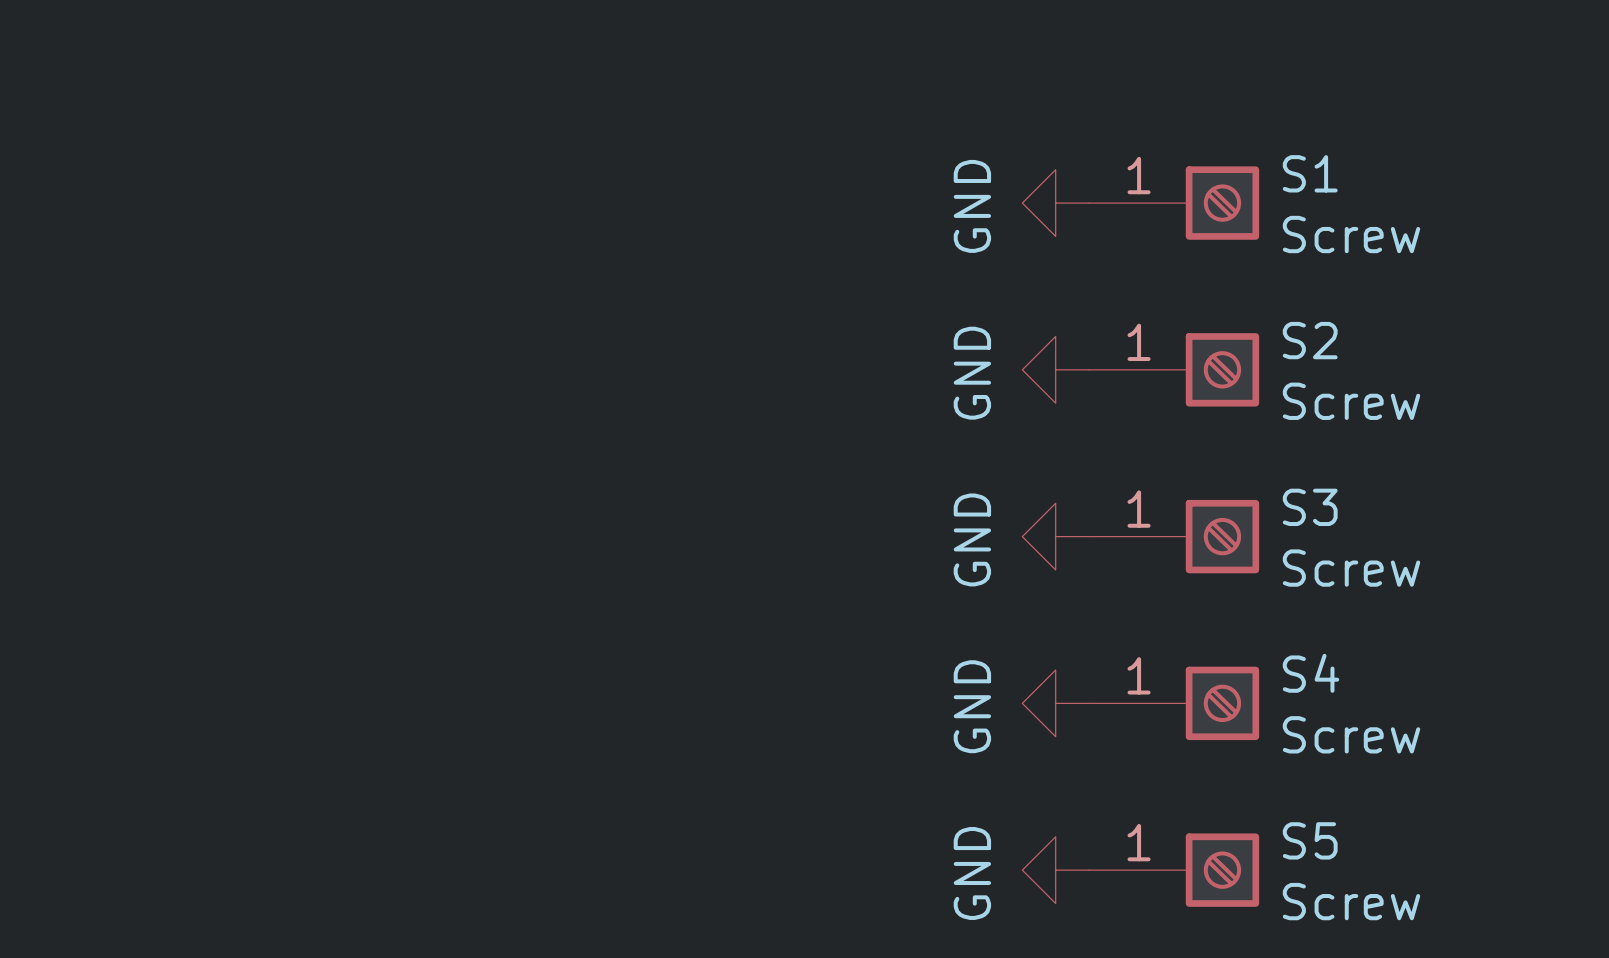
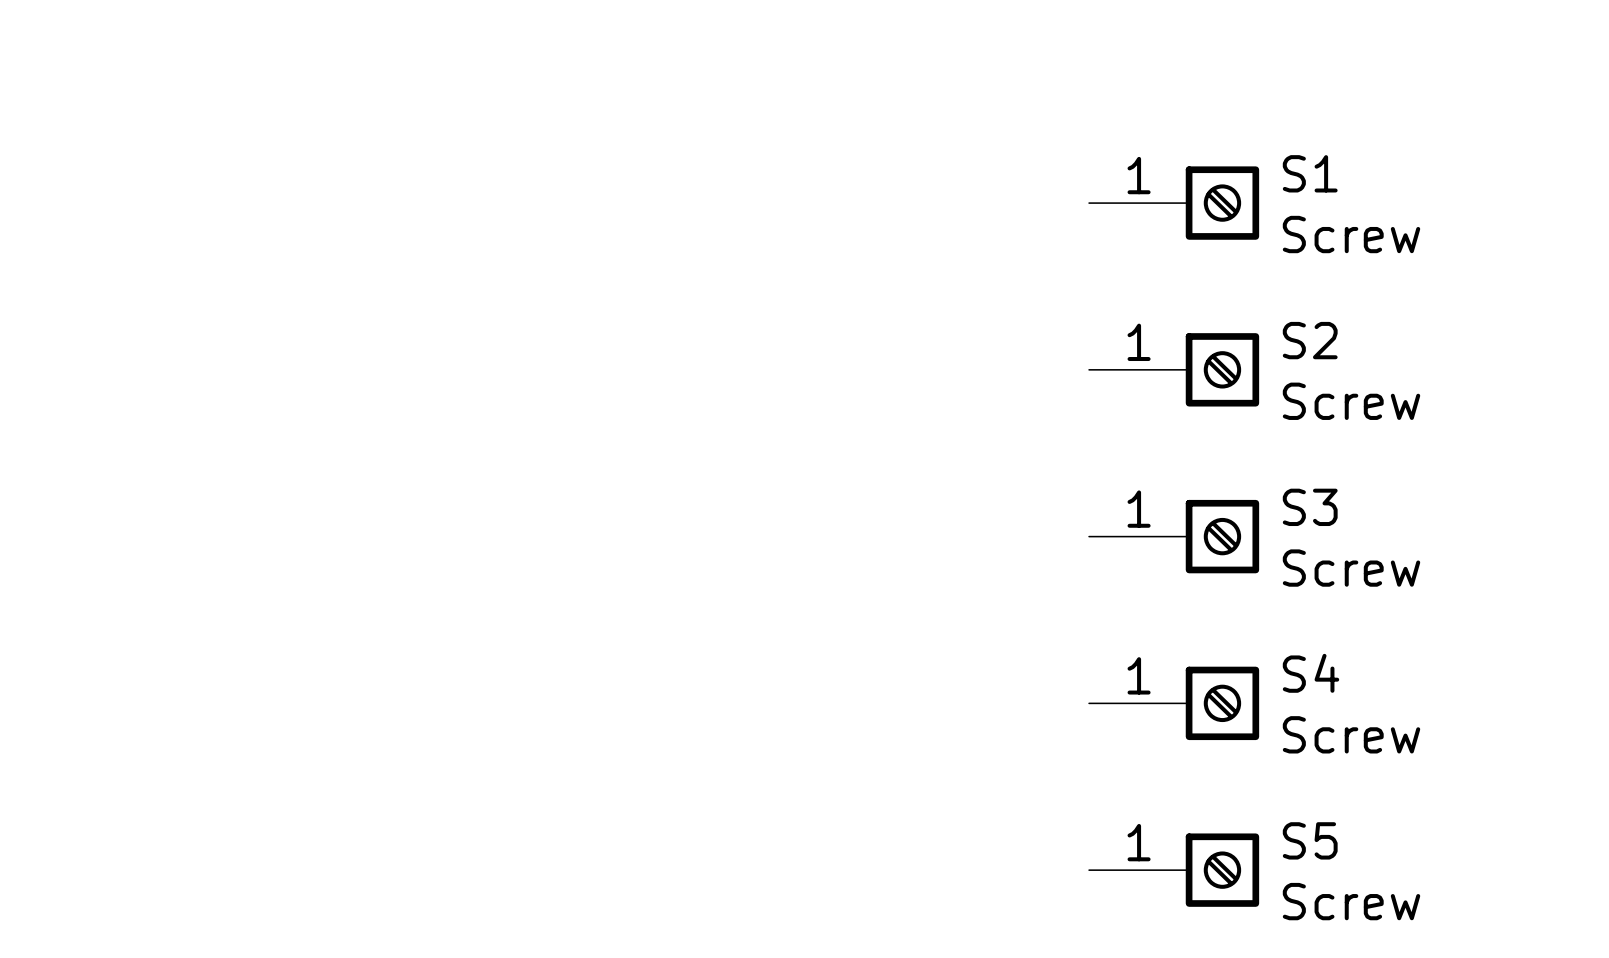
power symbol: GND (1055, 203) -> none
power symbol: GND (1055, 369) -> none
power symbol: GND (1055, 536) -> none
power symbol: GND (1055, 703) -> none
power symbol: GND (1055, 870) -> none

